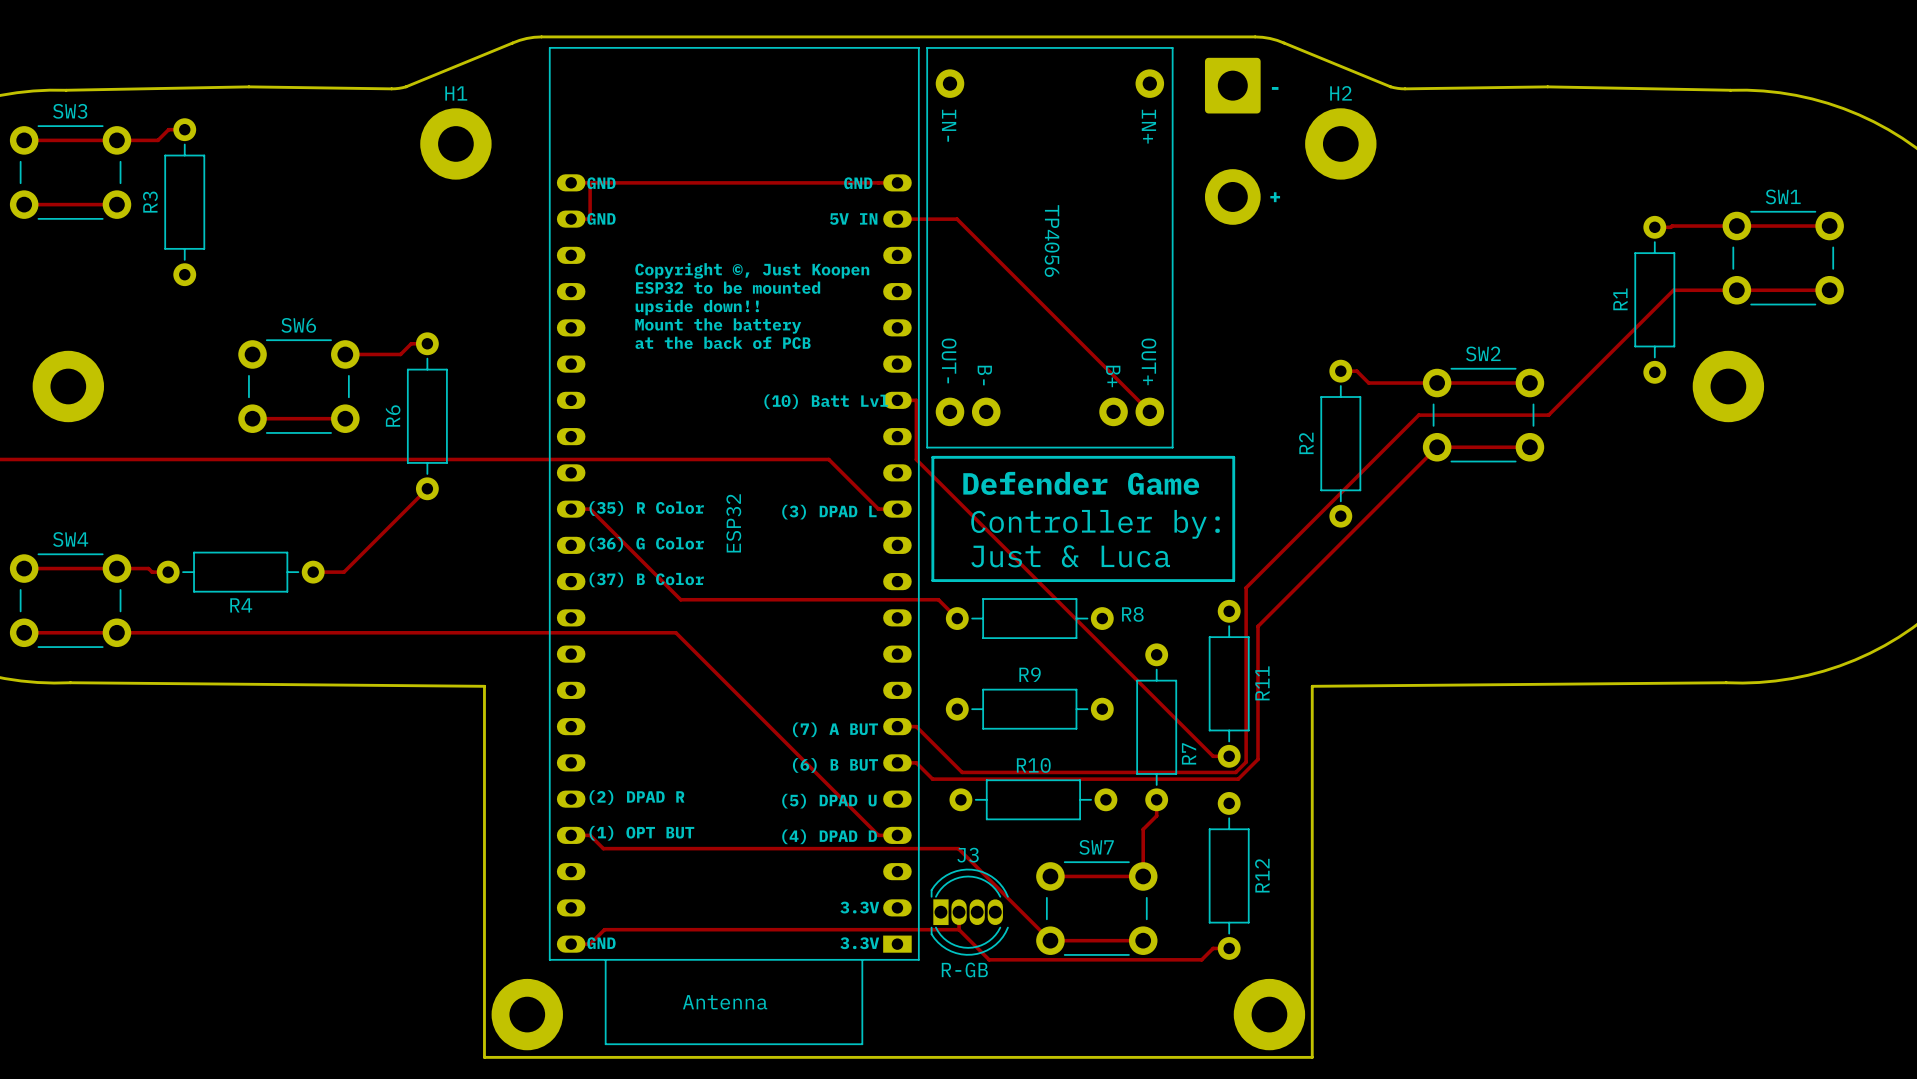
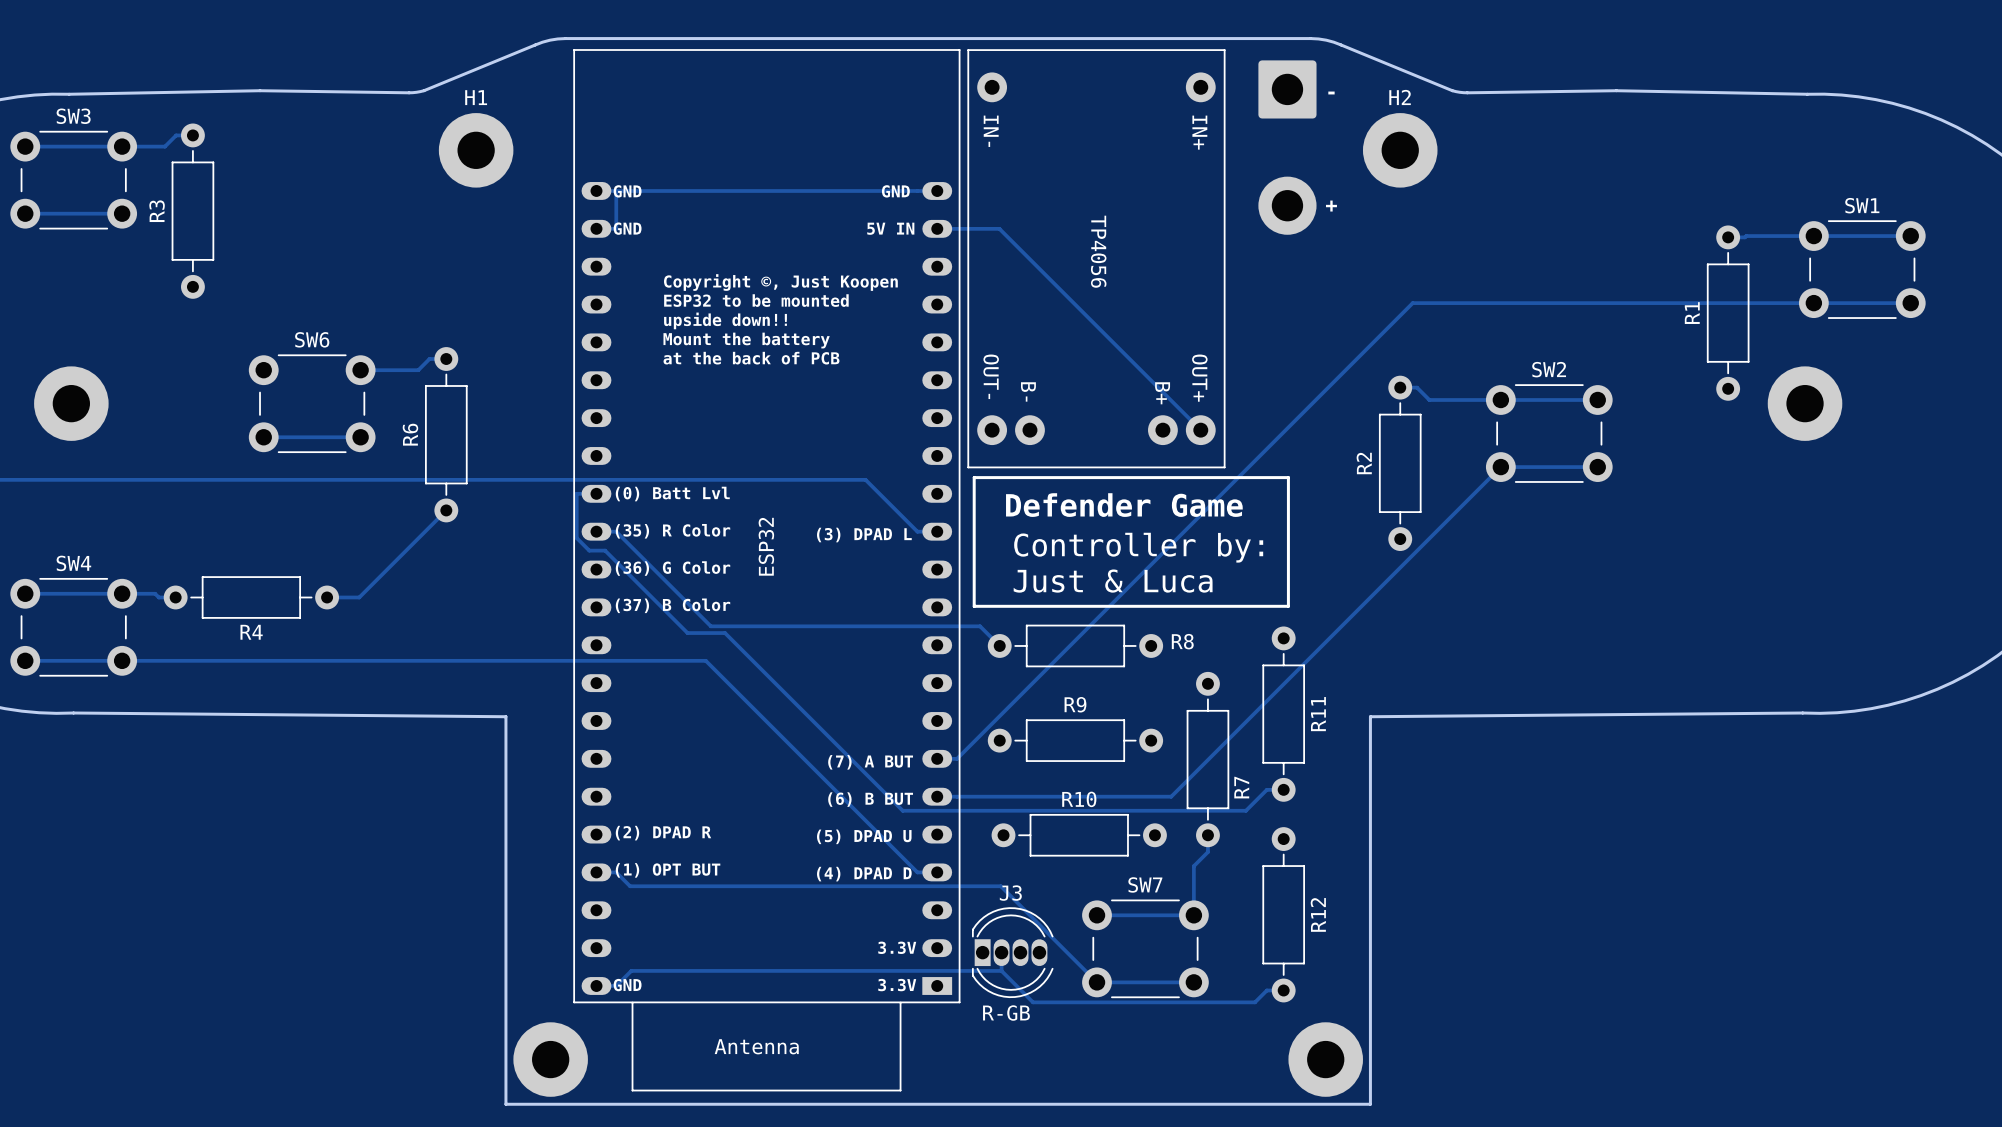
track: (1673, 290) (1548, 415) (1418, 415) (1246, 587) (1246, 762) (1235, 772) (962, 772) (916, 726) -> (1747, 303) (1412, 303) (957, 758)
track: (897, 400) (916, 400) (916, 459) (1213, 756) -> (596, 493) (576, 493) (576, 538) (589, 550) (605, 550) (687, 633) (725, 633) (902, 810) (1245, 810) (1266, 789)
text: (10) Batt Lvl (826, 401) -> none
text: none -> (0) Batt Lvl (672, 494)
track: (1258, 626) (1258, 759) (1238, 779) (932, 779) (916, 762) -> (1313, 654) (1171, 796) (957, 796)

